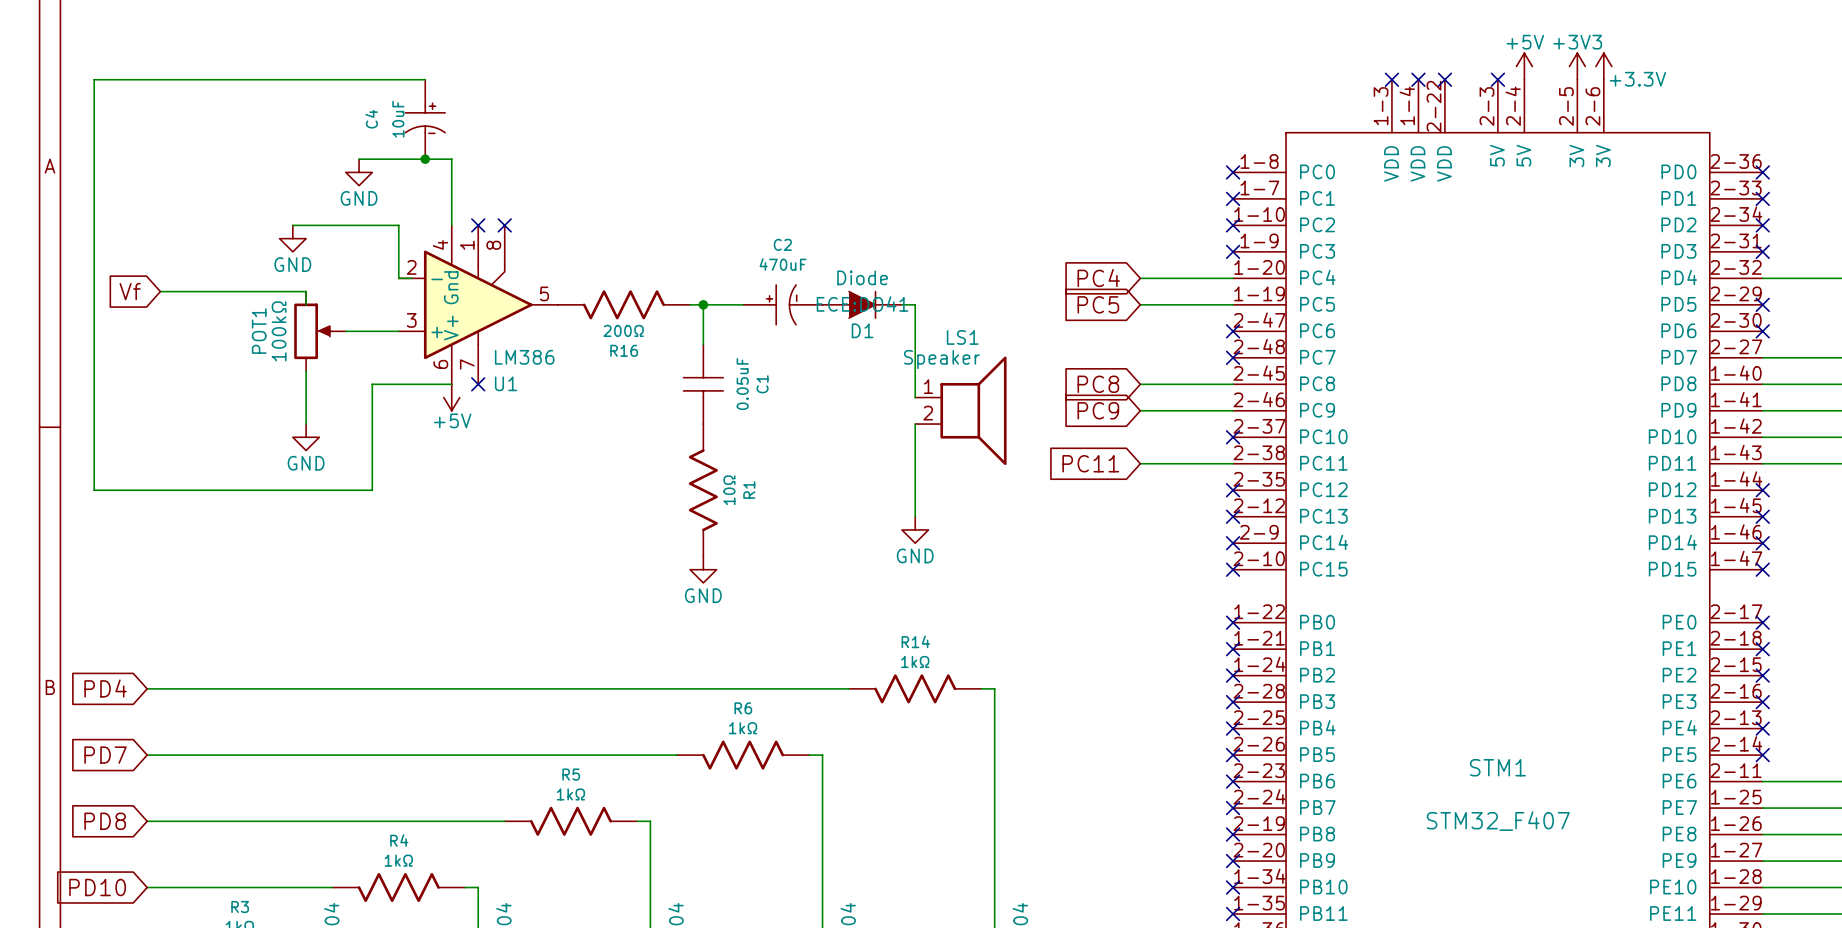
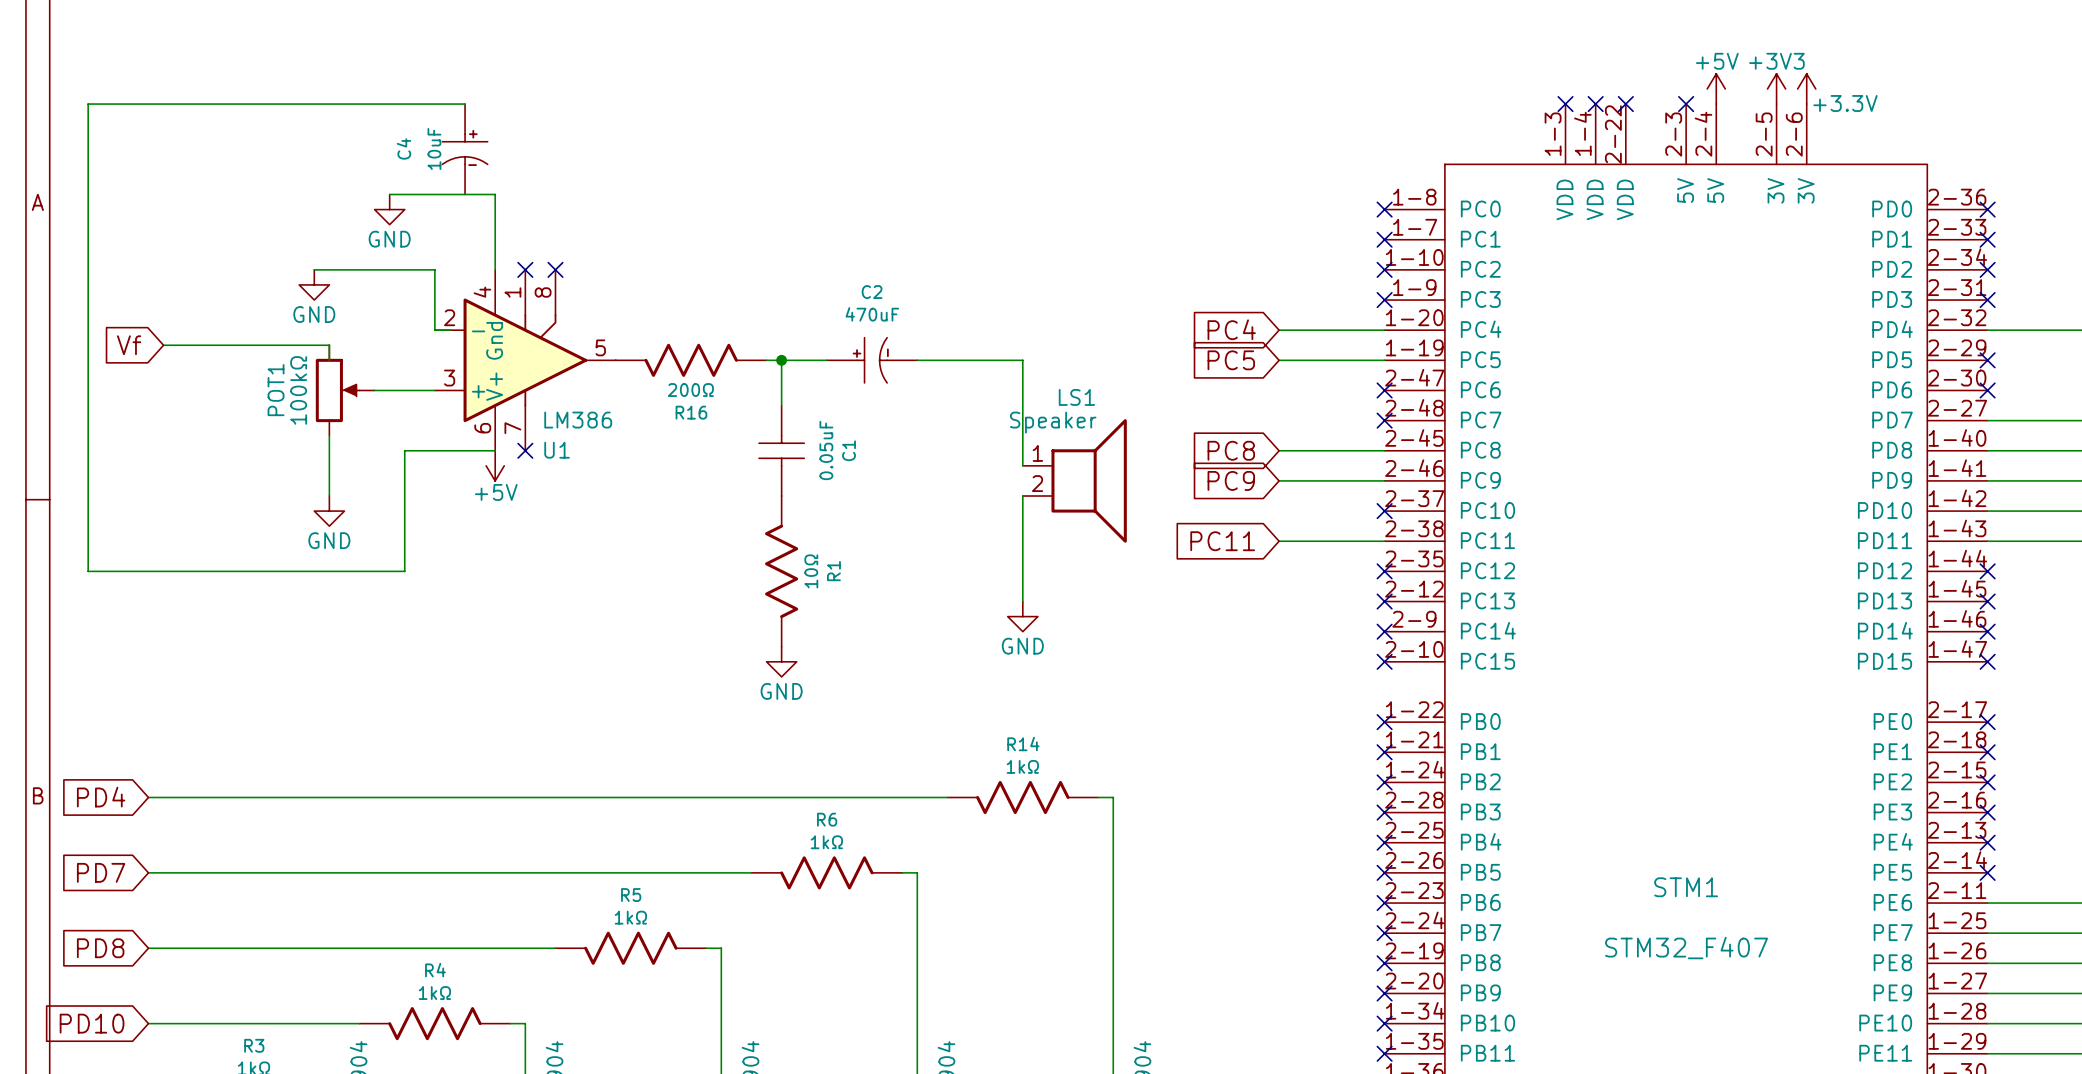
junction: (425, 159) -> none
D1: Diode (862, 304) -> none

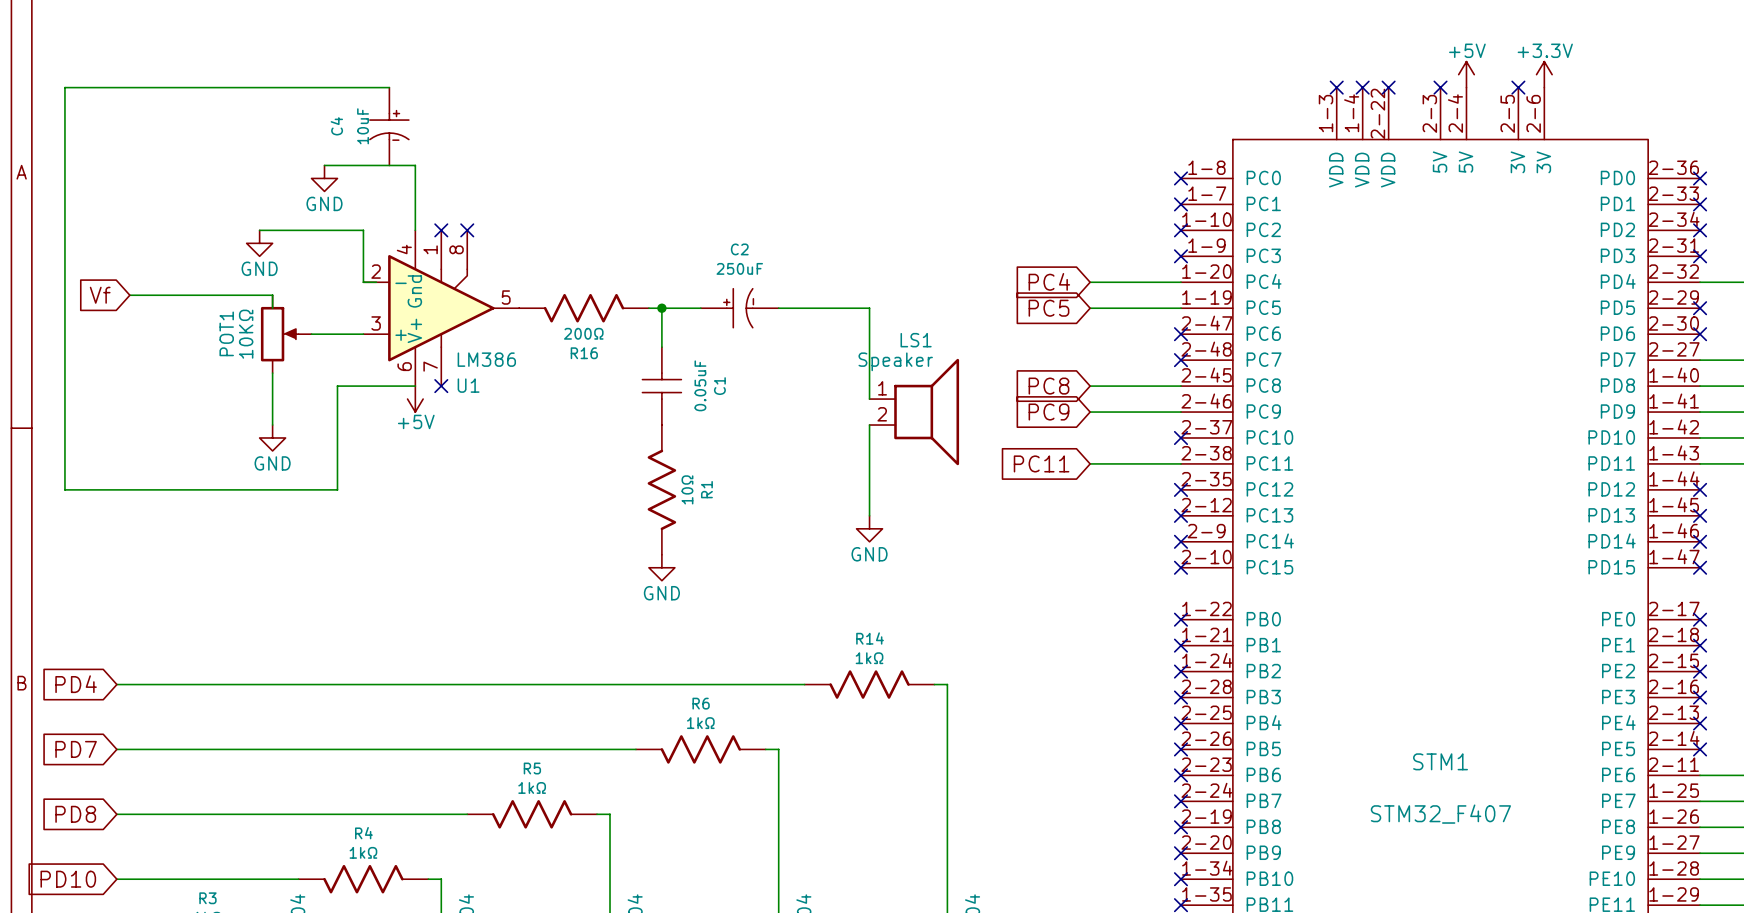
power symbol: +3V3 (1776, 88) -> none
power symbol text position: +3.3V (1845, 103) -> +3.3V (1545, 50)
no-connect mark: none -> (1518, 87)
C2 value: 470uF (872, 314) -> 250uF (739, 268)
POT1 value: 100kΩ (298, 390) -> 10KΩ (246, 334)

